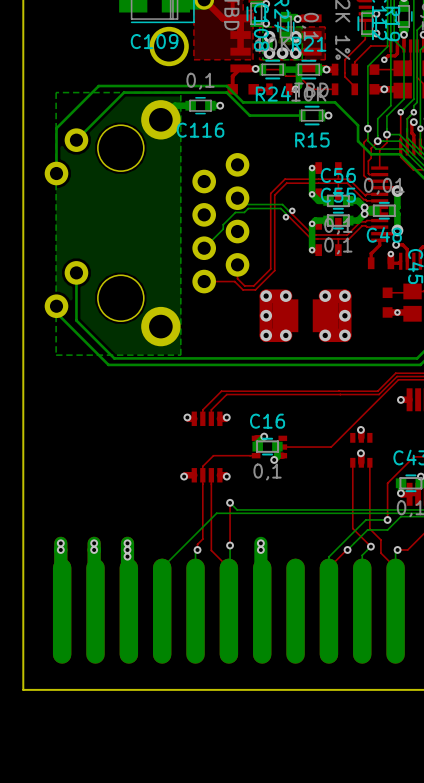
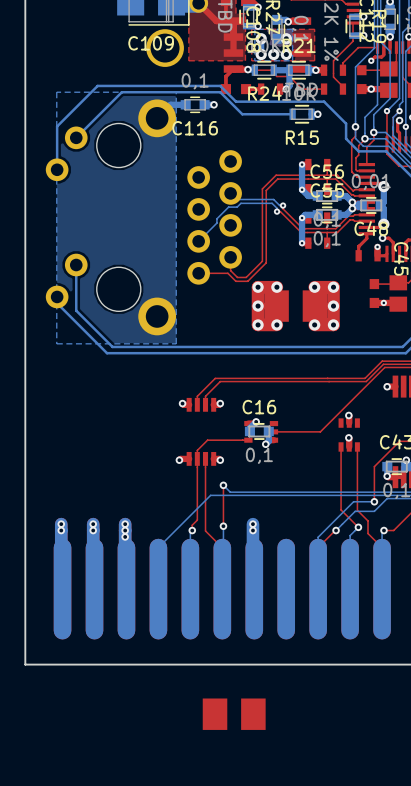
part: none -> (234, 714)

